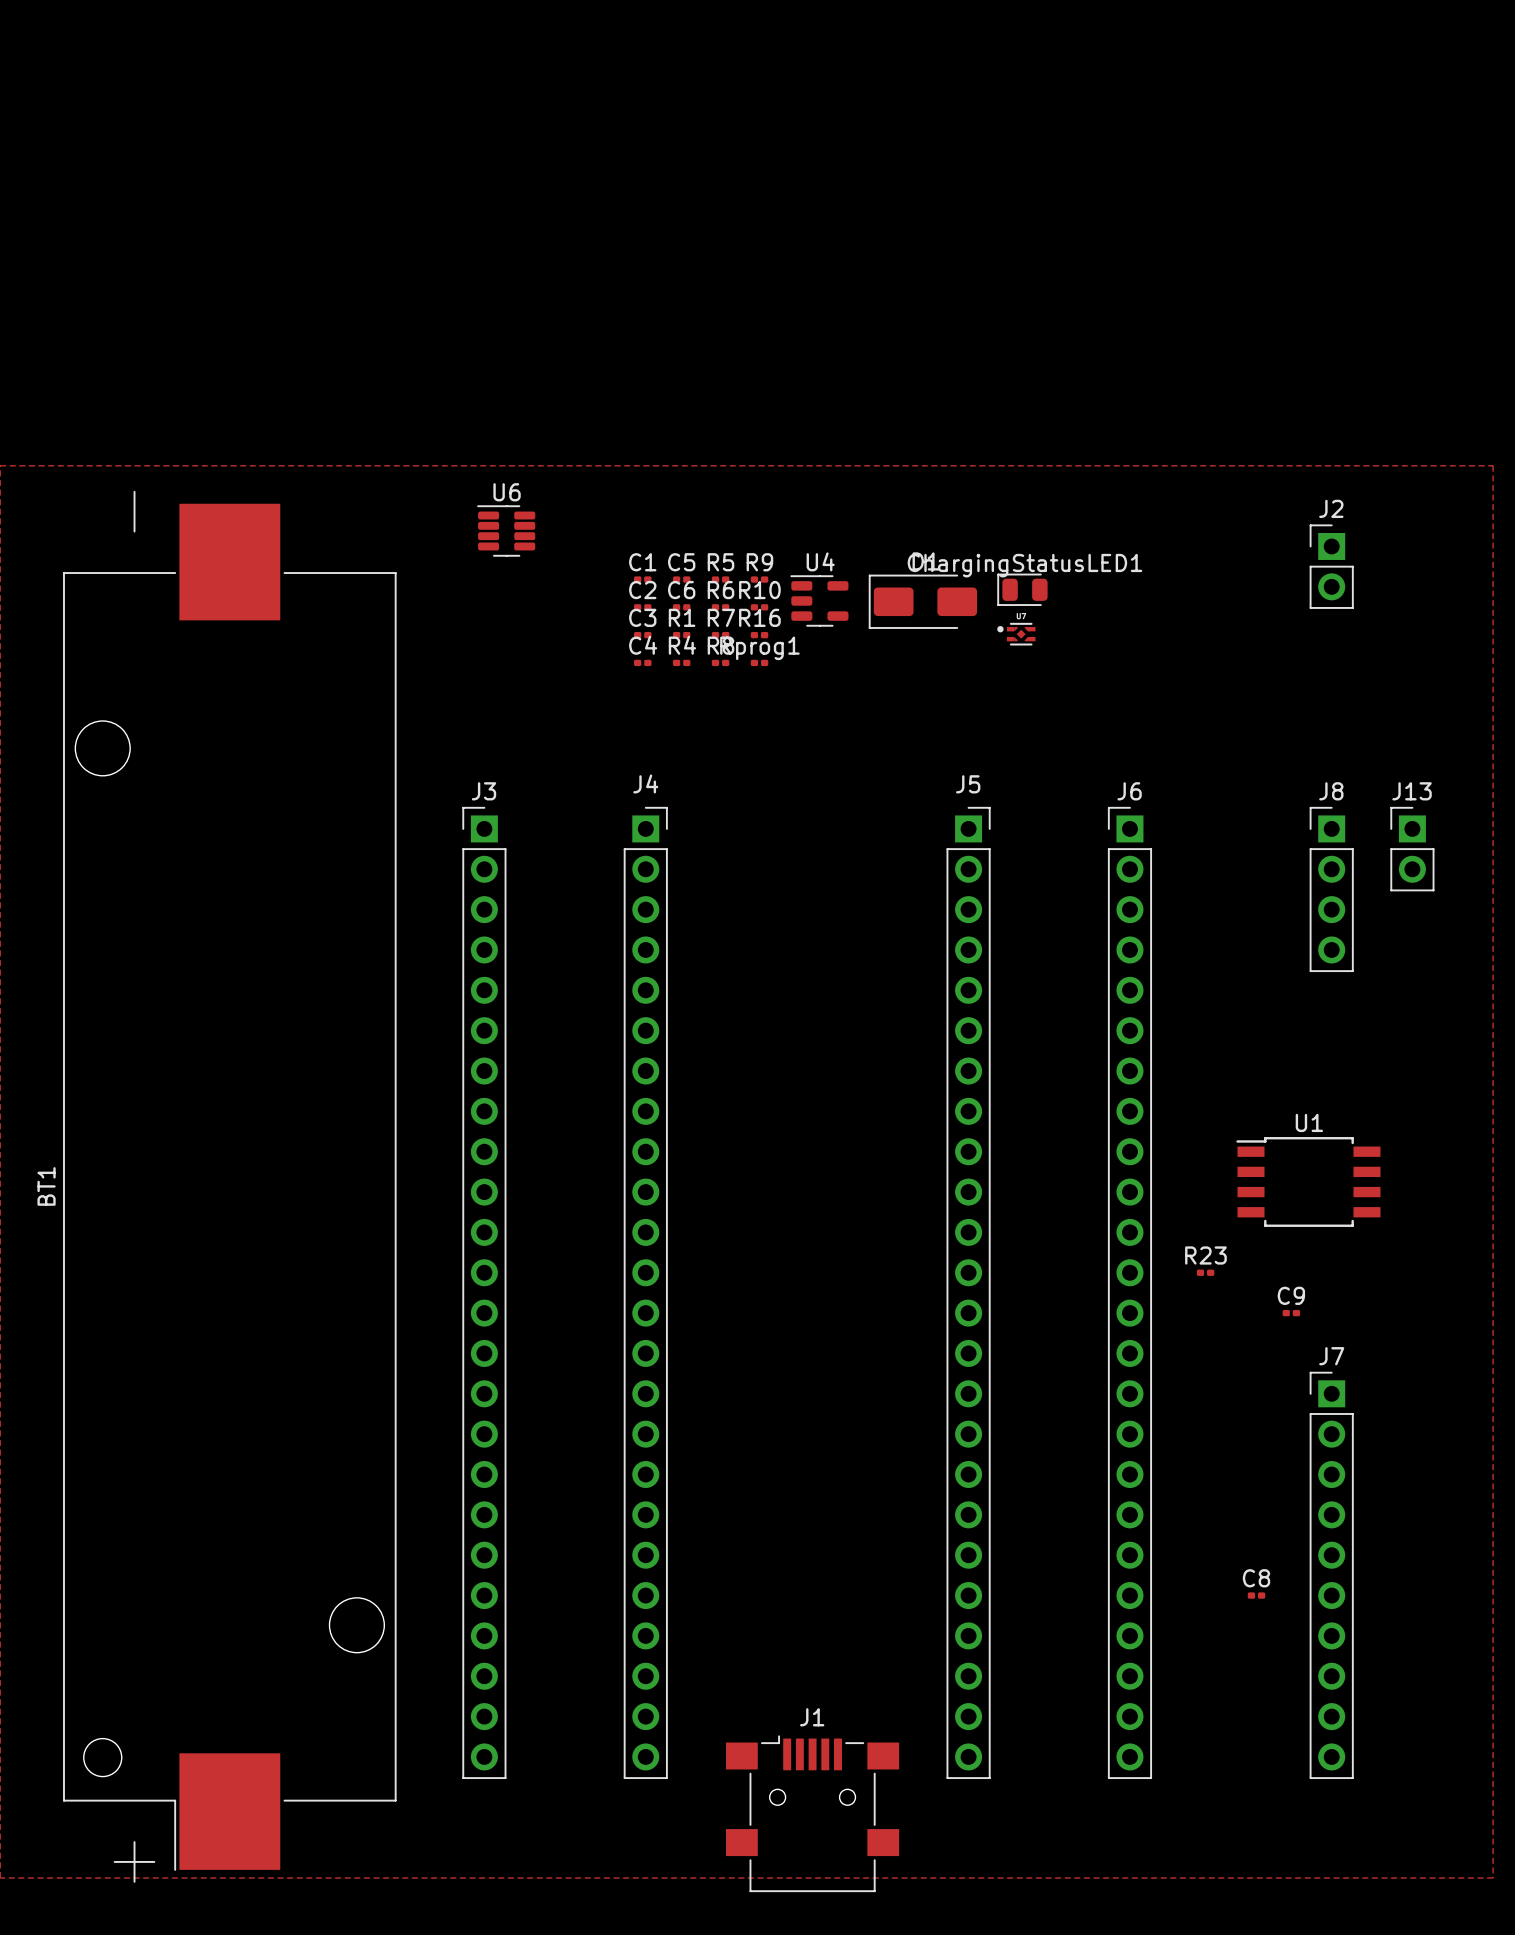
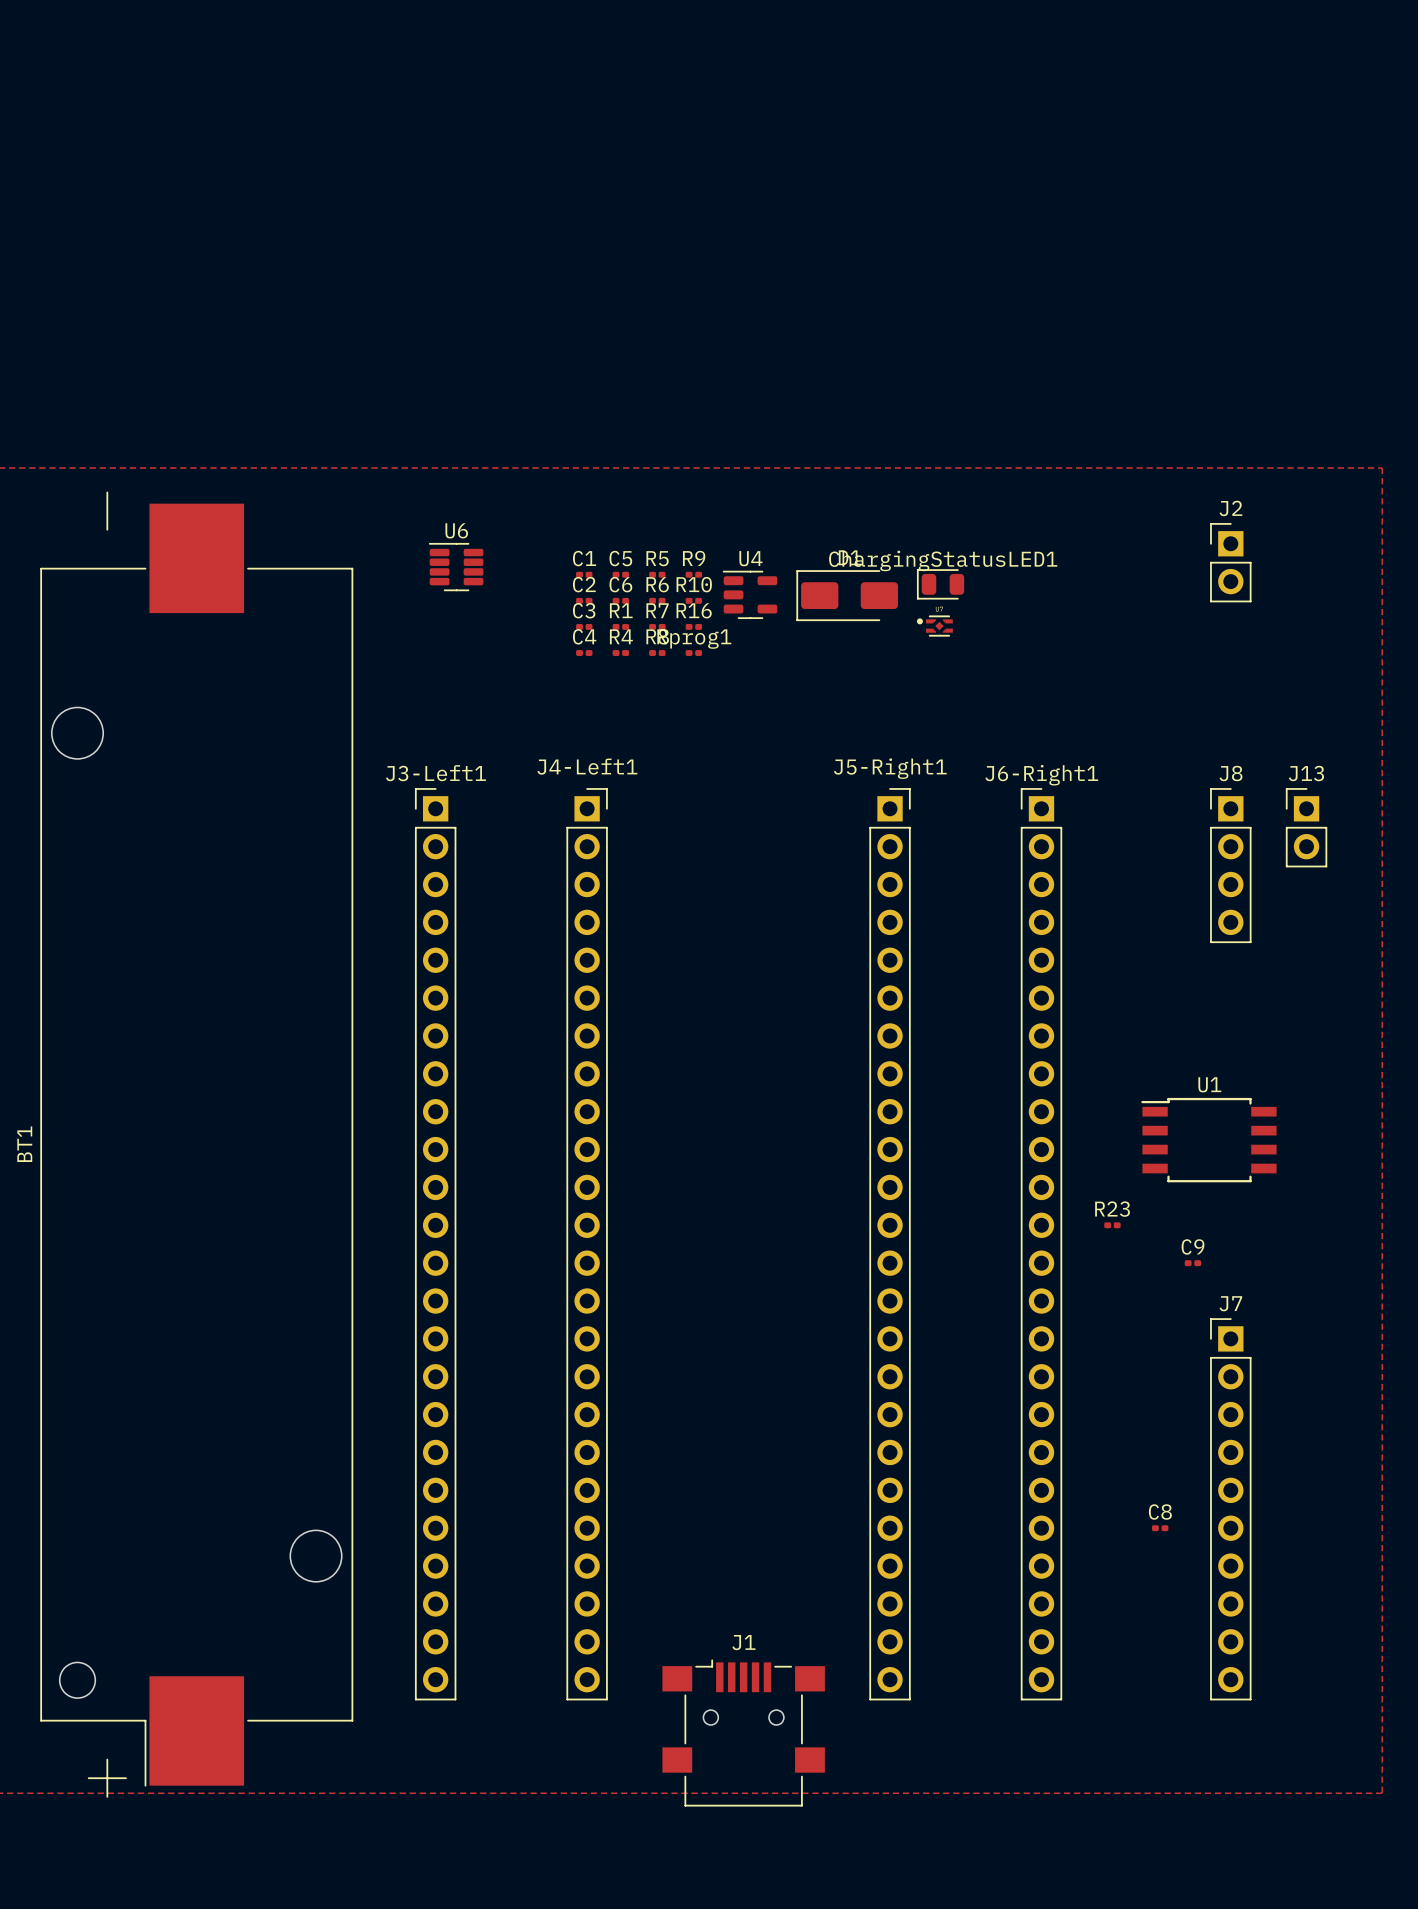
U6 position: (506, 531) -> (456, 567)
J4 name: J4 (645, 783) -> J4-Left1 (587, 766)
J5 name: J5 (968, 784) -> J5-Right1 (890, 768)
J3 name: J3 (484, 791) -> J3-Left1 (435, 773)
J6 name: J6 (1129, 791) -> J6-Right1 (1041, 775)

